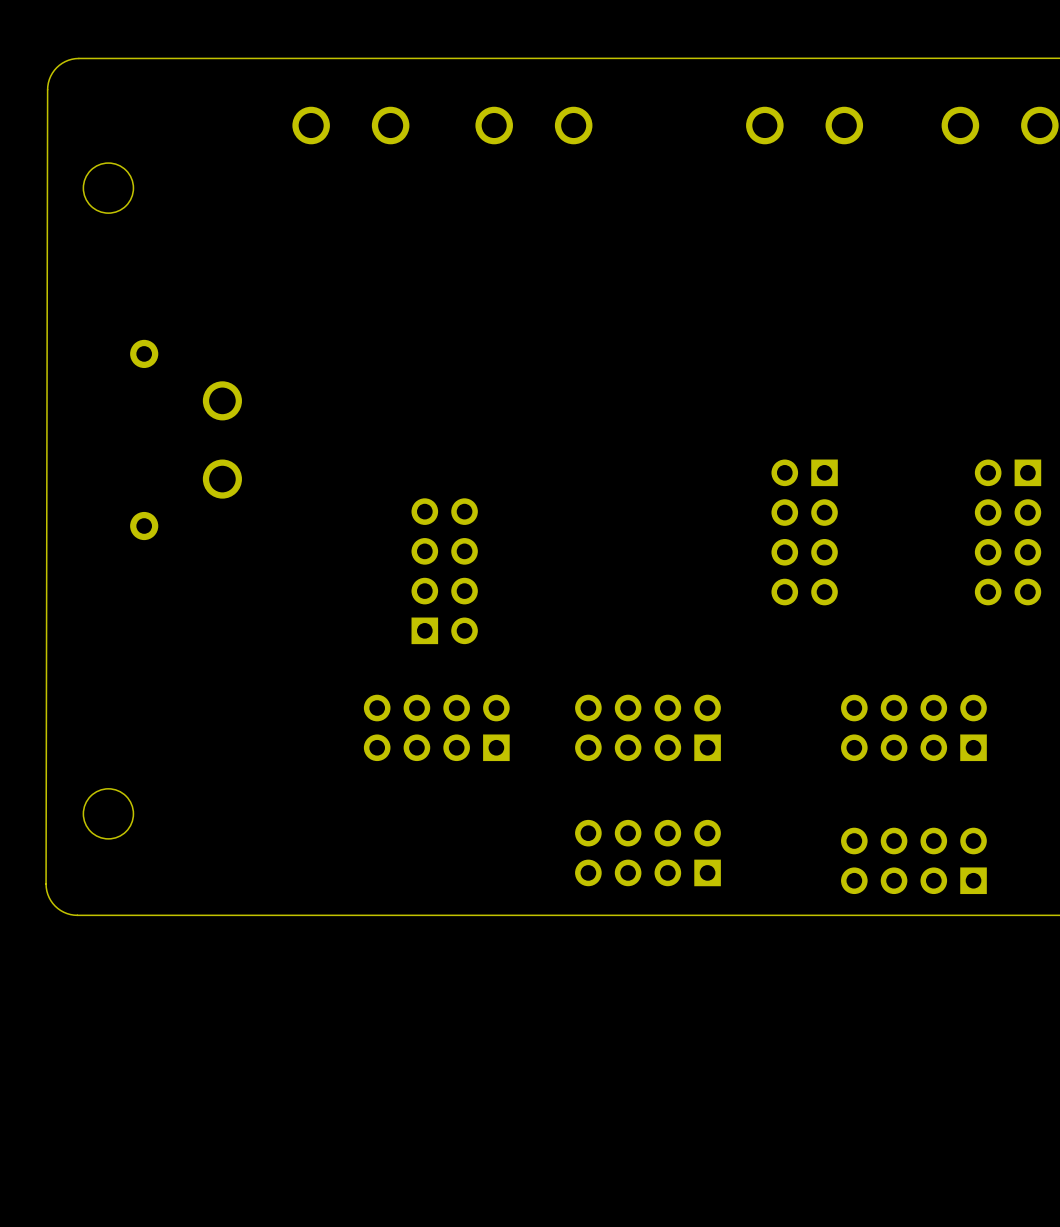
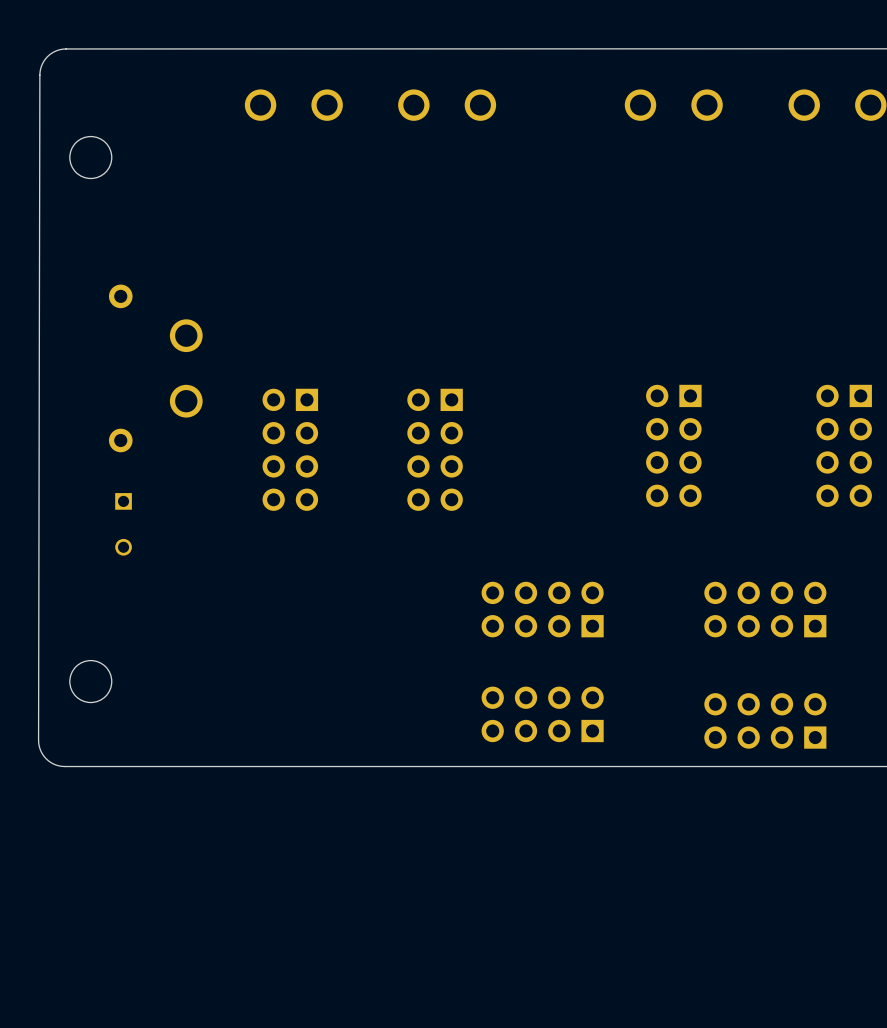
part: none -> (290, 449)
part: none -> (435, 449)
part: (444, 571) -> none
part: none -> (123, 524)
part: (436, 727) -> none

